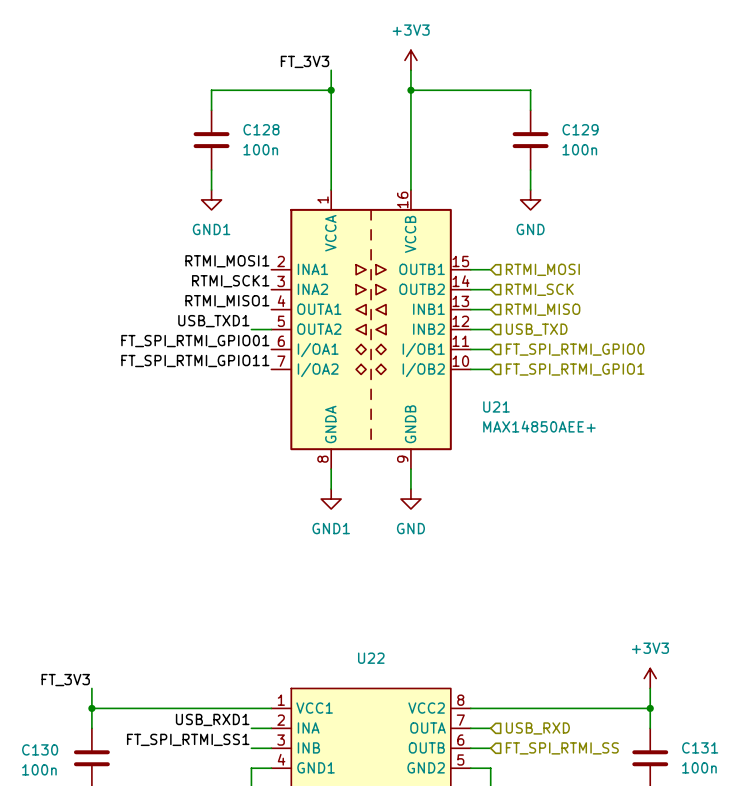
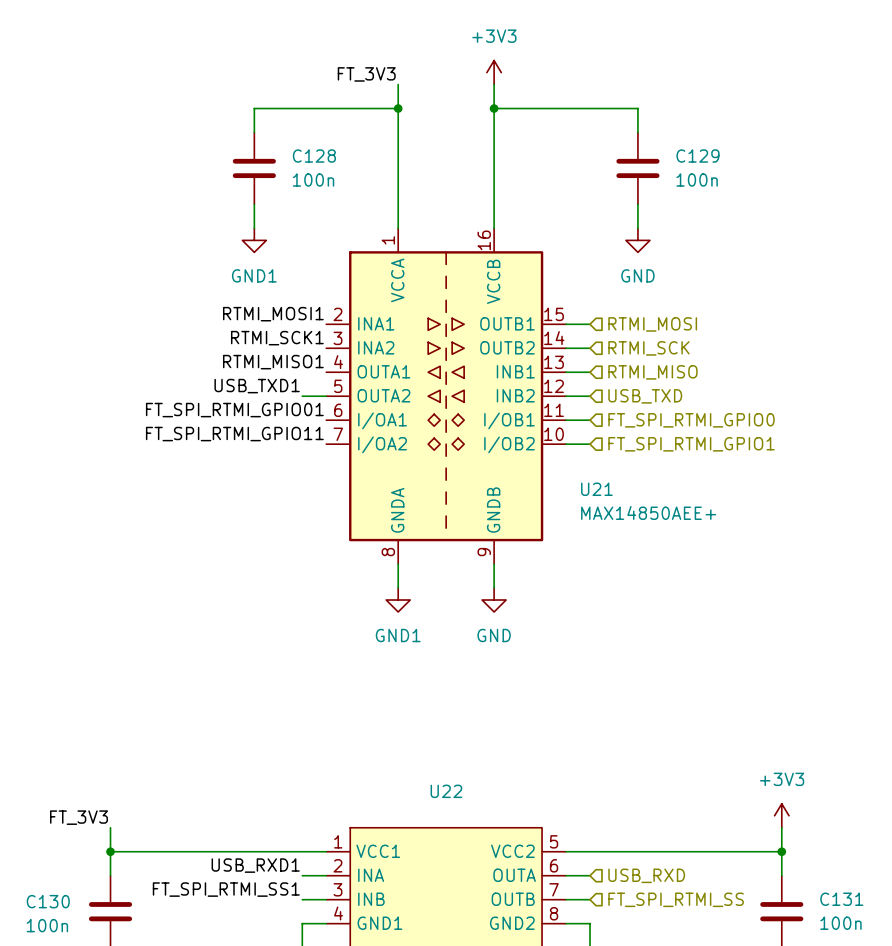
U22 pin number: 8 (460, 700) -> 5 (554, 841)
U22 pin number: 7 (460, 720) -> 6 (554, 865)
U22 pin number: 6 (460, 740) -> 7 (554, 889)
U22 pin number: 5 (460, 760) -> 8 (554, 913)

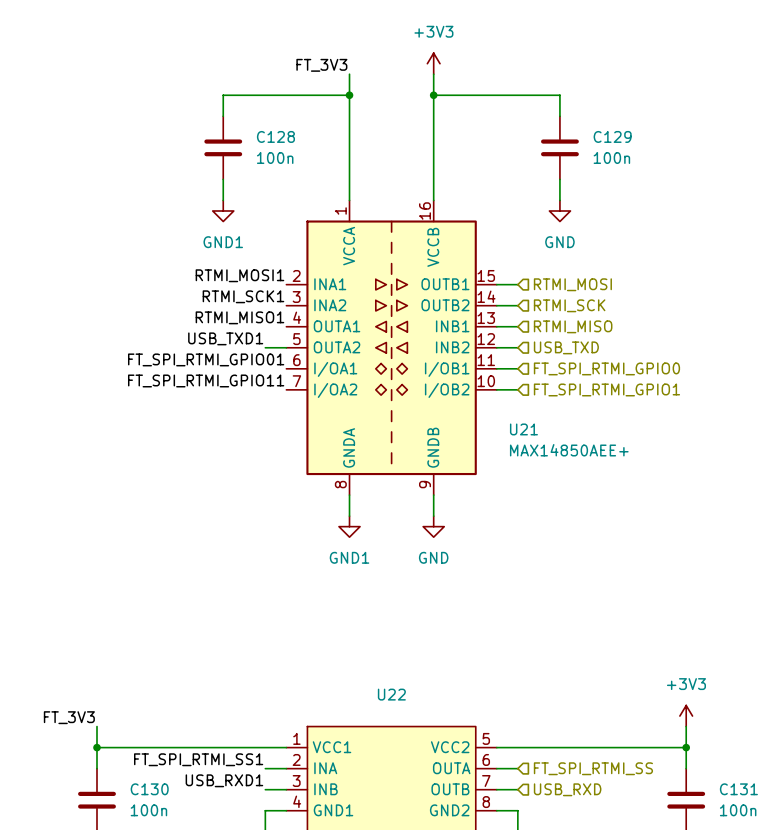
label: USB_RXD1 (255, 865) -> FT_SPI_RTMI_SS1 (198, 759)
hierarchical label: USB_RXD (646, 875) -> FT_SPI_RTMI_SS (593, 768)
label: FT_SPI_RTMI_SS1 (226, 889) -> USB_RXD1 (224, 780)
hierarchical label: FT_SPI_RTMI_SS (676, 899) -> USB_RXD (567, 789)
C130 name position: C130 (48, 901) -> C130 (149, 789)
C130 value position: 100n (47, 925) -> 100n (148, 810)

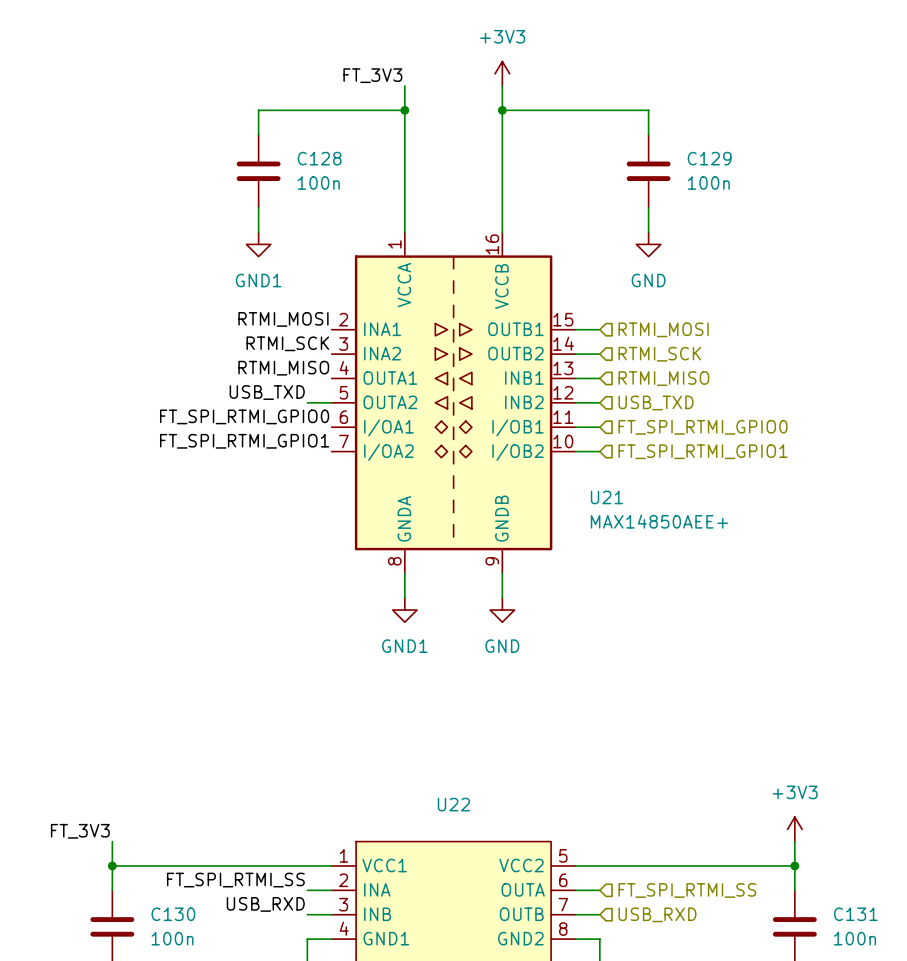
label: RTMI_MOSI1 (239, 275) -> RTMI_MOSI (283, 319)
label: RTMI_SCK1 (243, 296) -> RTMI_SCK (287, 343)
label: RTMI_MISO1 (239, 317) -> RTMI_MISO (283, 368)
label: USB_TXD1 (225, 338) -> USB_TXD (267, 392)
label: FT_SPI_RTMI_GPIO01 (206, 359) -> FT_SPI_RTMI_GPIO0 (244, 416)
label: FT_SPI_RTMI_GPIO11 (206, 380) -> FT_SPI_RTMI_GPIO1 (244, 441)
label: FT_SPI_RTMI_SS1 (198, 759) -> FT_SPI_RTMI_SS (235, 880)
label: USB_RXD1 (224, 780) -> USB_RXD (265, 904)

